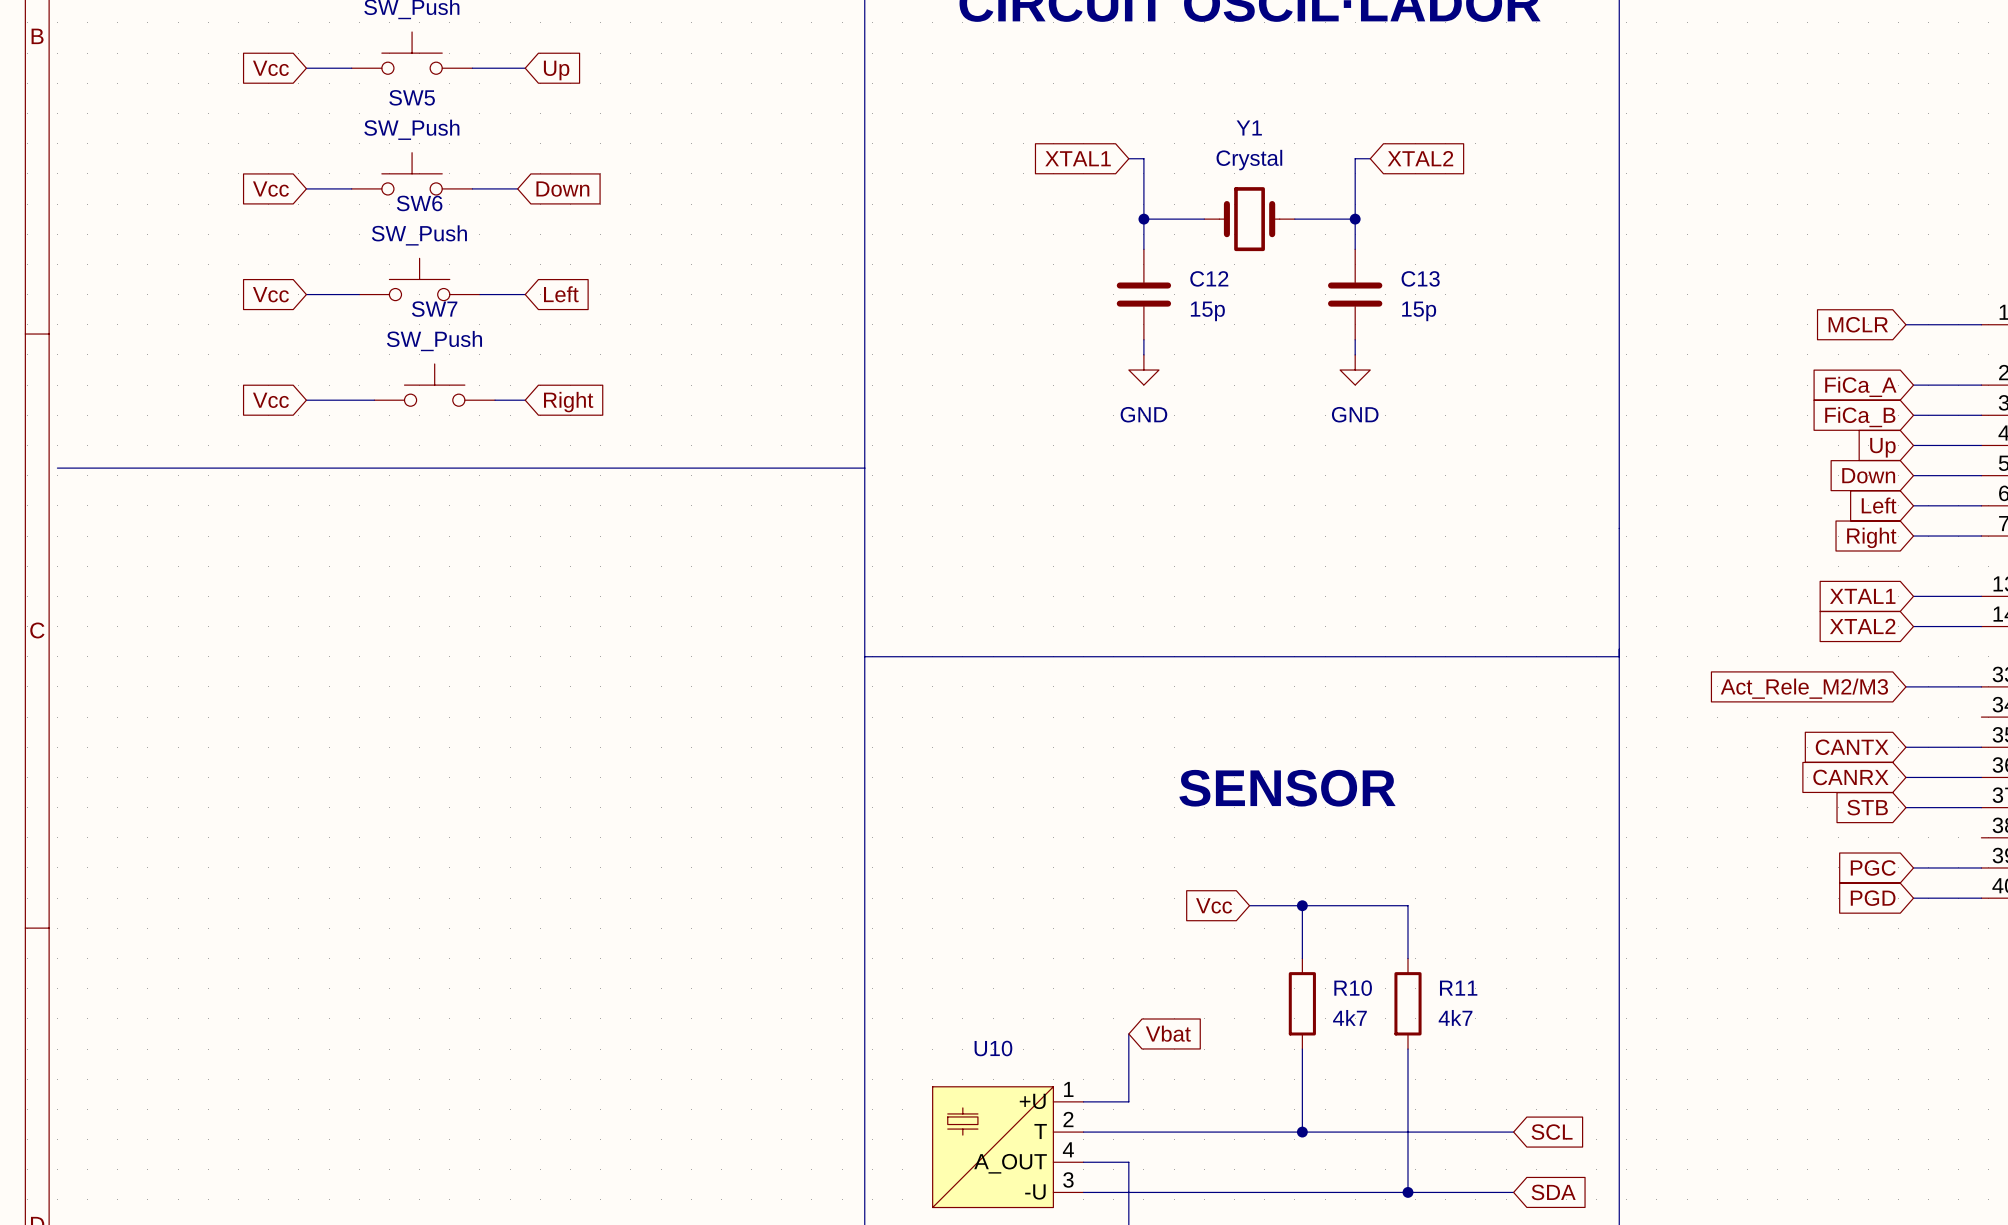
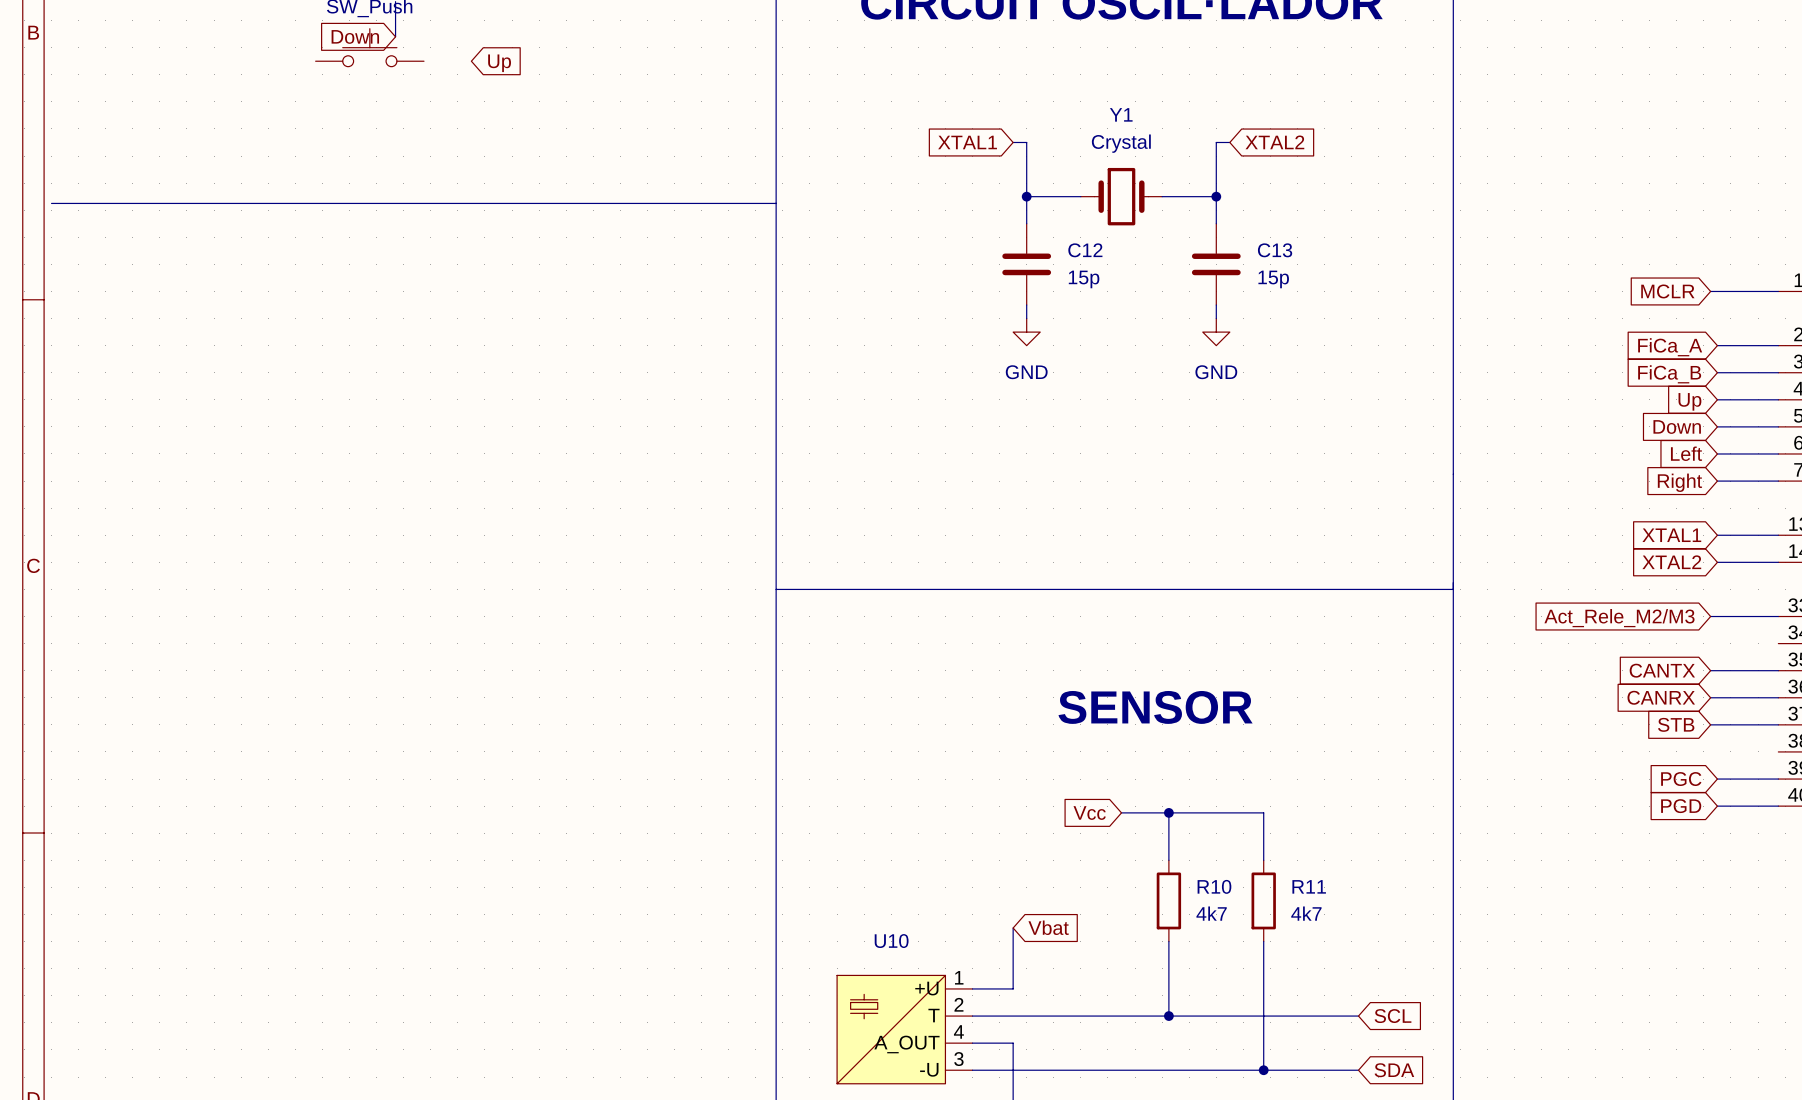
wire: none -> (395, 1) (395, 36)
global label: Vcc (270, 68) -> none
wire: (306, 68) (351, 68) -> none
wire: (472, 68) (525, 68) -> none
SW5: SW_Push (412, 173) -> none
wire: (306, 188) (351, 188) -> none
wire: (472, 188) (517, 188) -> none
global label: Vcc (270, 189) -> none
global label rotation: 0° (562, 189) -> 180° (355, 36)
global label position: Down (562, 189) -> Down (355, 36)
SW6: SW_Push (419, 279) -> none
global label: Vcc (270, 294) -> none
wire: (306, 294) (359, 294) -> none
wire: (479, 294) (525, 294) -> none
global label: Left (561, 294) -> none
SW7: SW_Push (434, 385) -> none
global label: Vcc (270, 400) -> none
wire: (306, 400) (374, 400) -> none
wire: (495, 400) (525, 400) -> none
global label: Right (568, 402) -> none
line: (57, 468) (864, 468) -> (51, 203) (776, 203)

